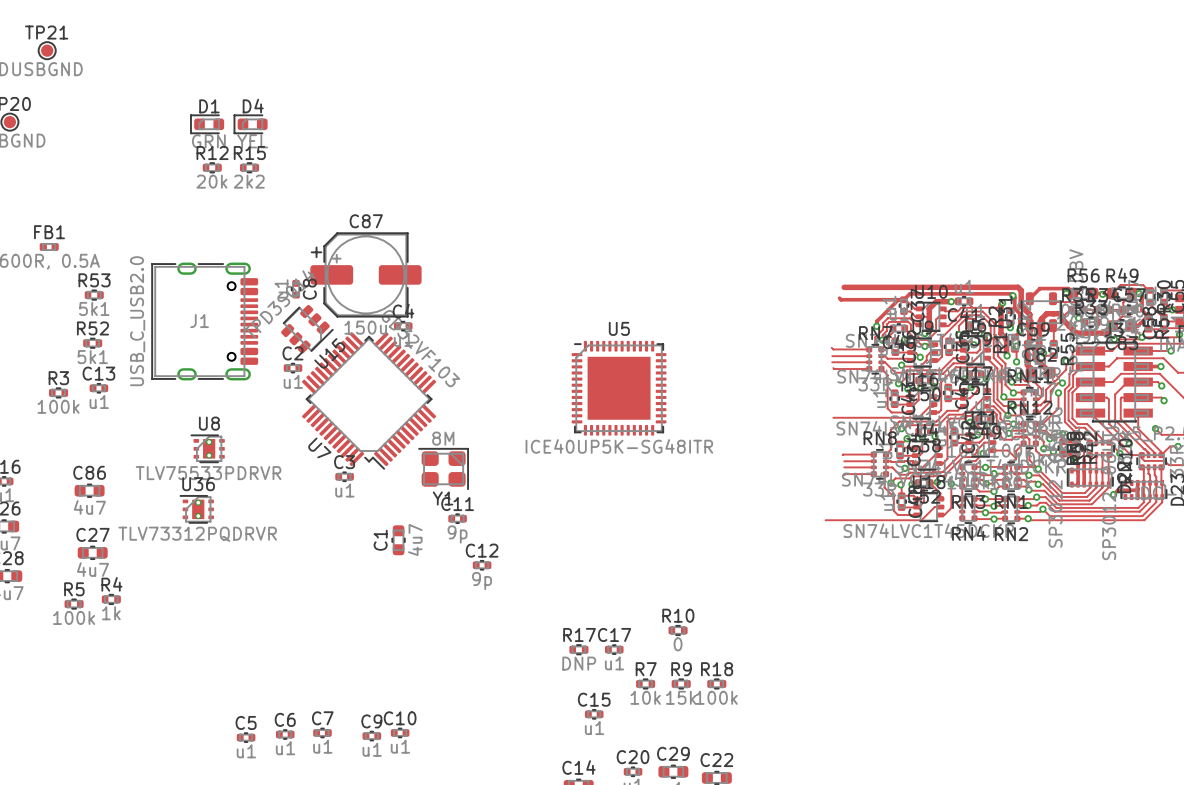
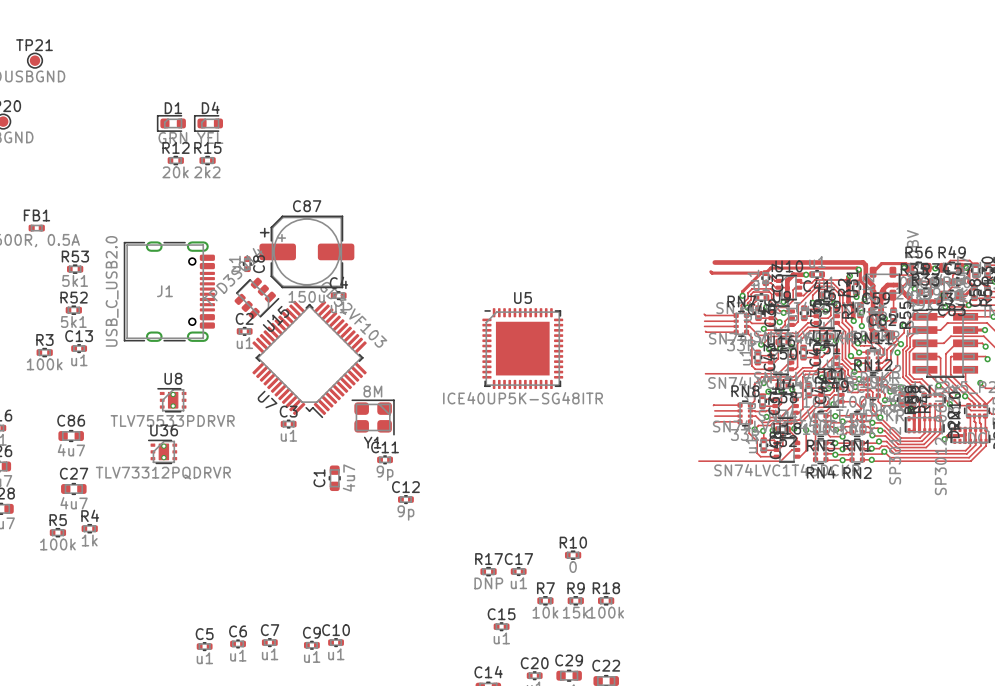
via: none -> (938, 385)
via: none -> (965, 396)

